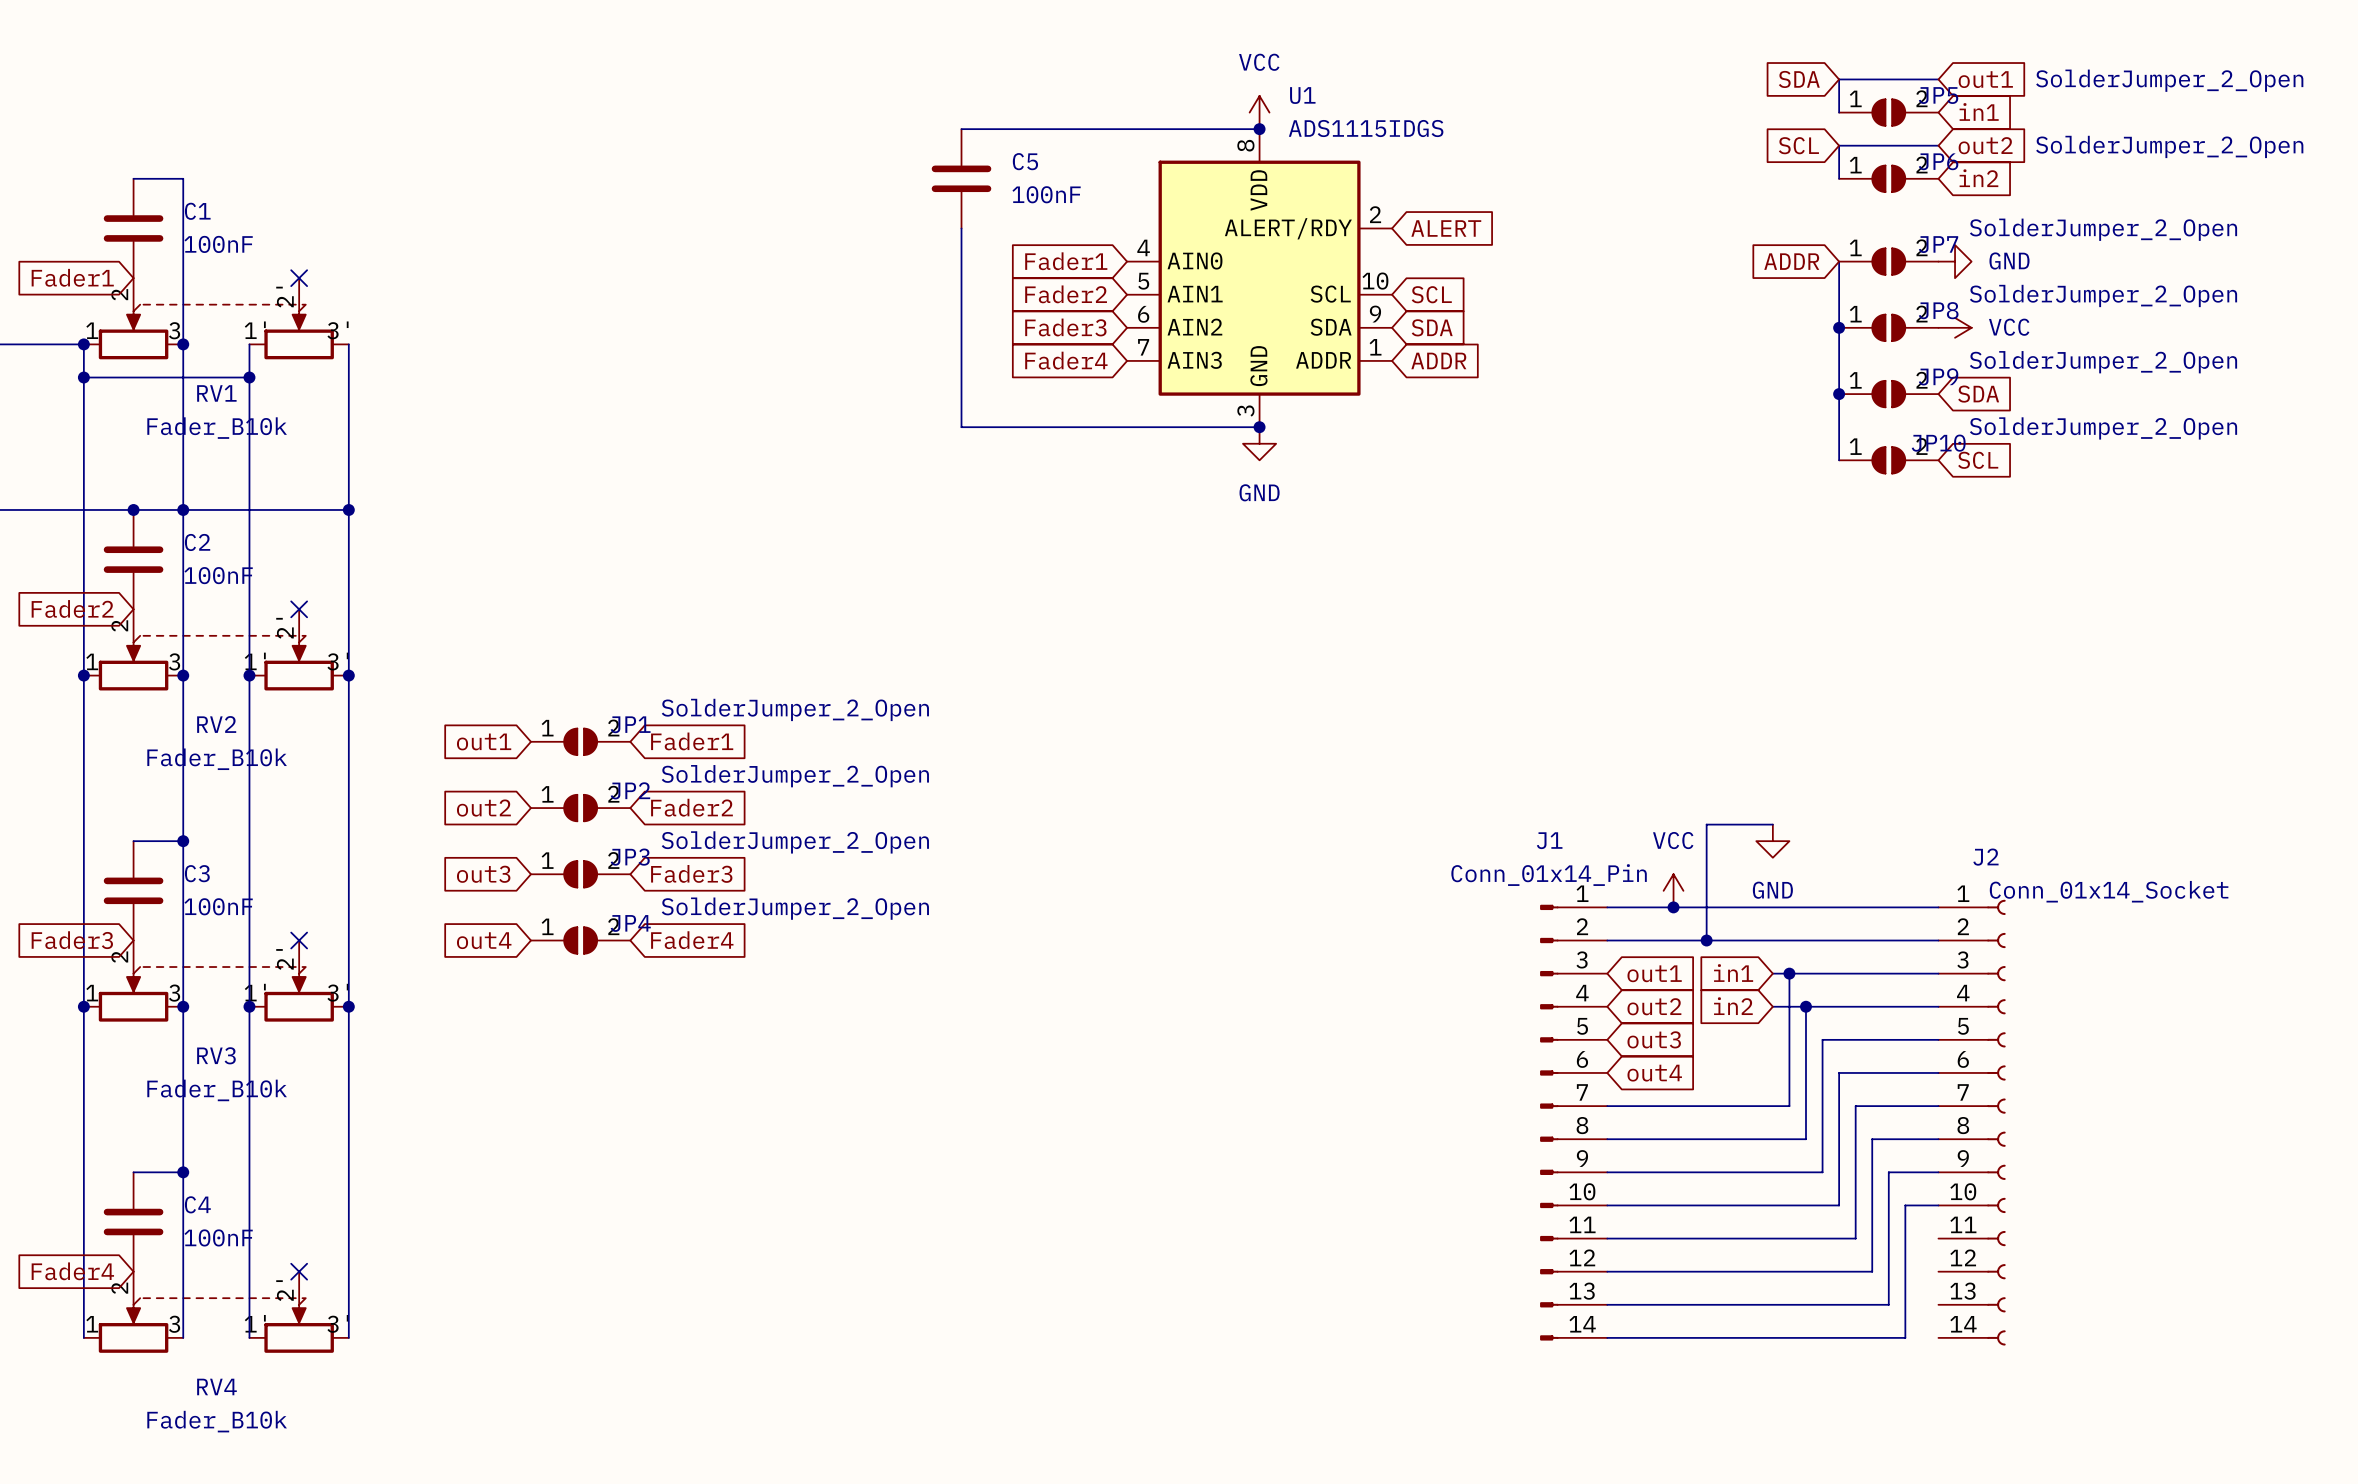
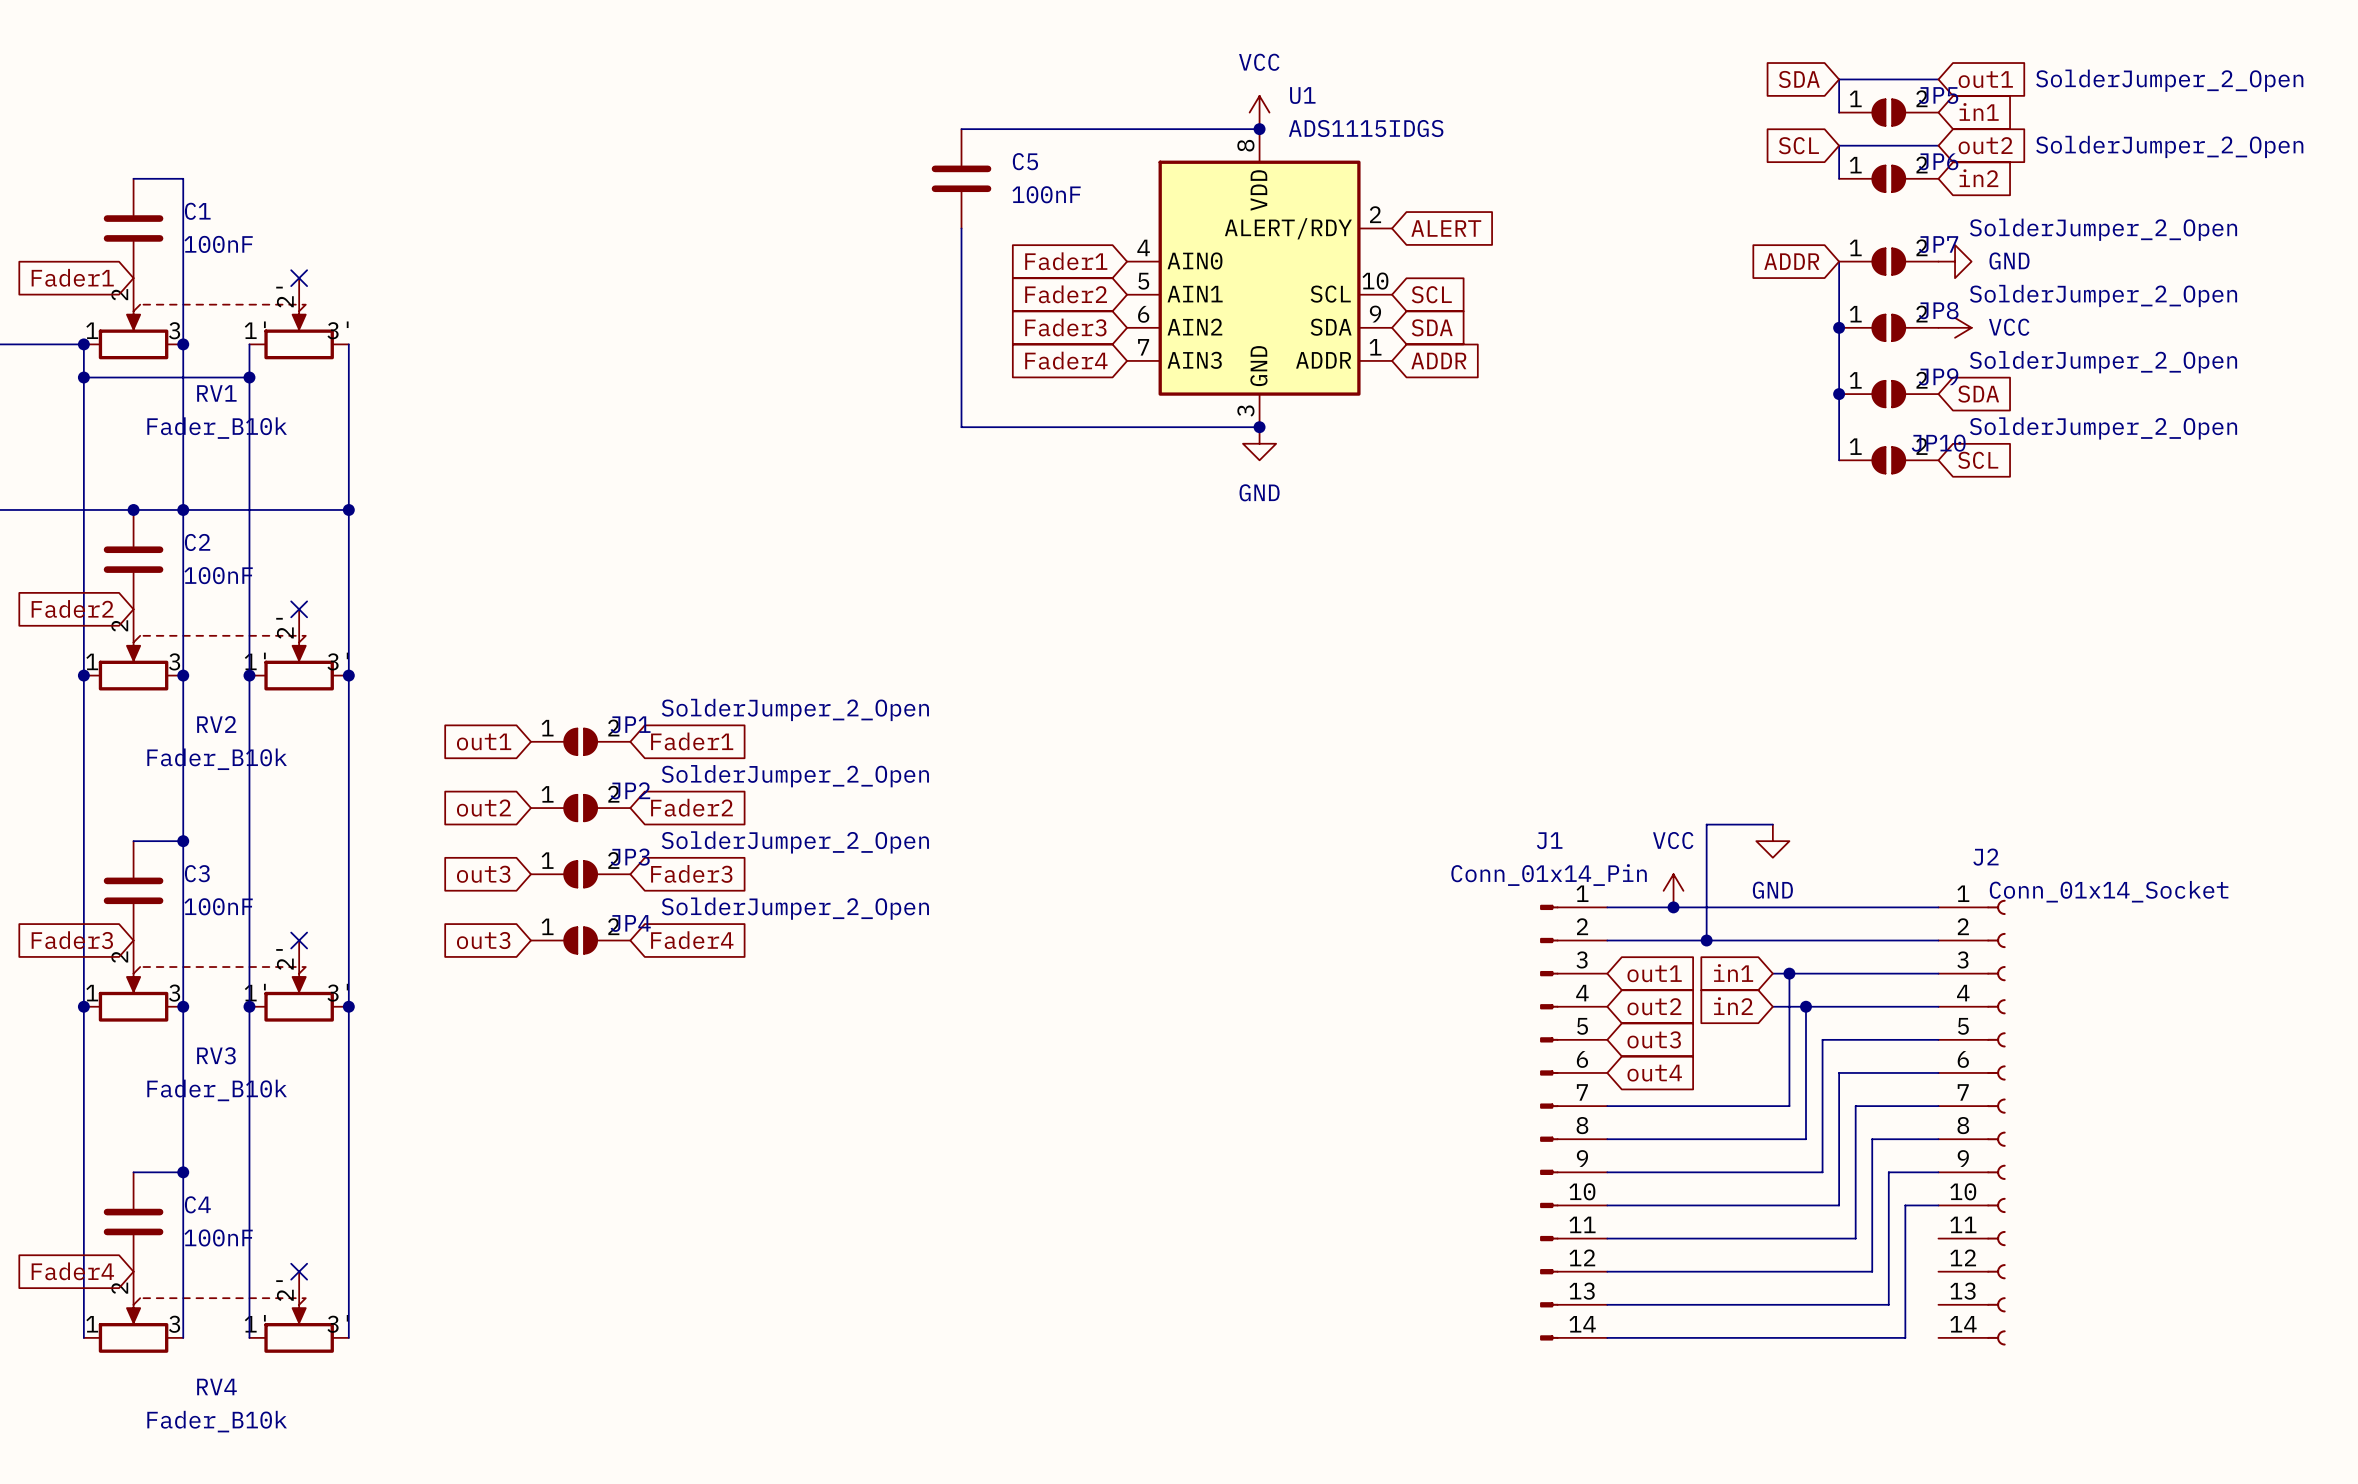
global label: out4 (484, 940) -> out3 (483, 940)

